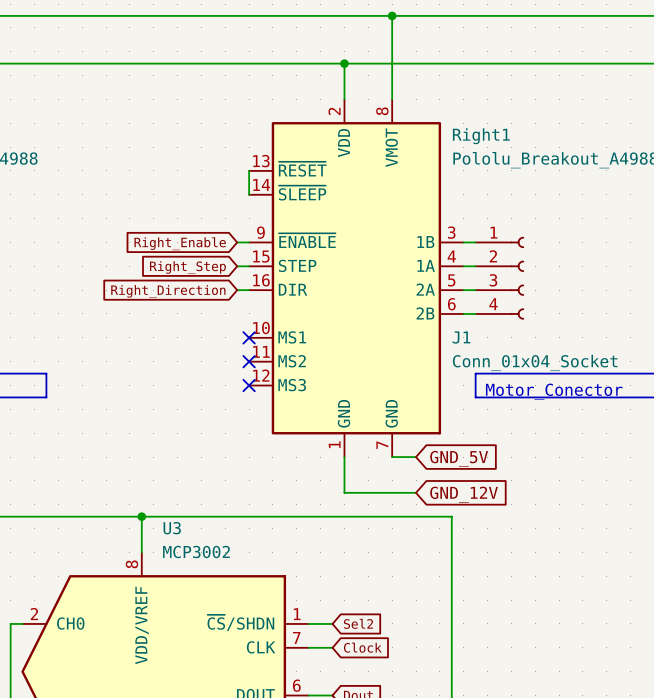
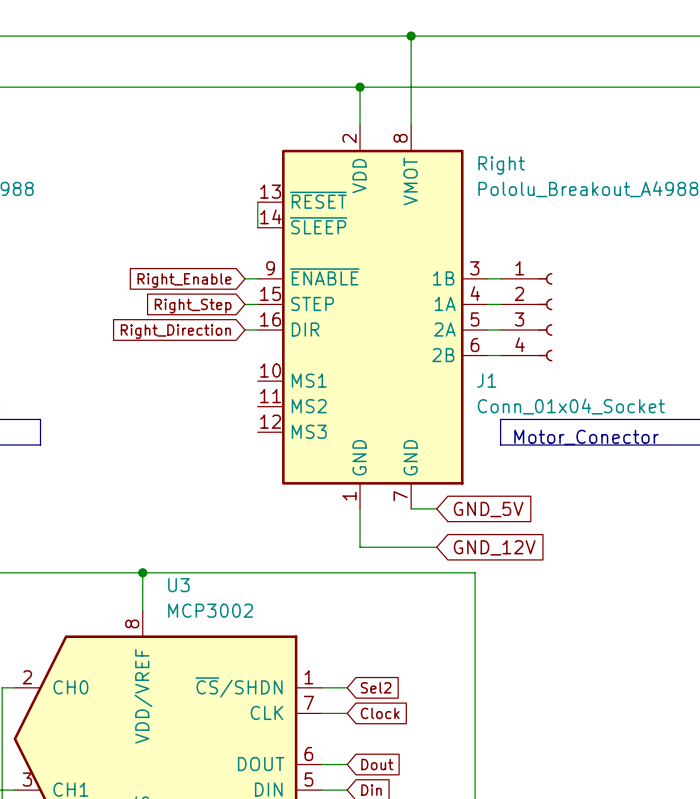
Right1 name: Right1 (481, 136) -> Right (501, 165)
no-connect mark: (249, 337) -> none
no-connect mark: (249, 361) -> none
no-connect mark: (249, 385) -> none

